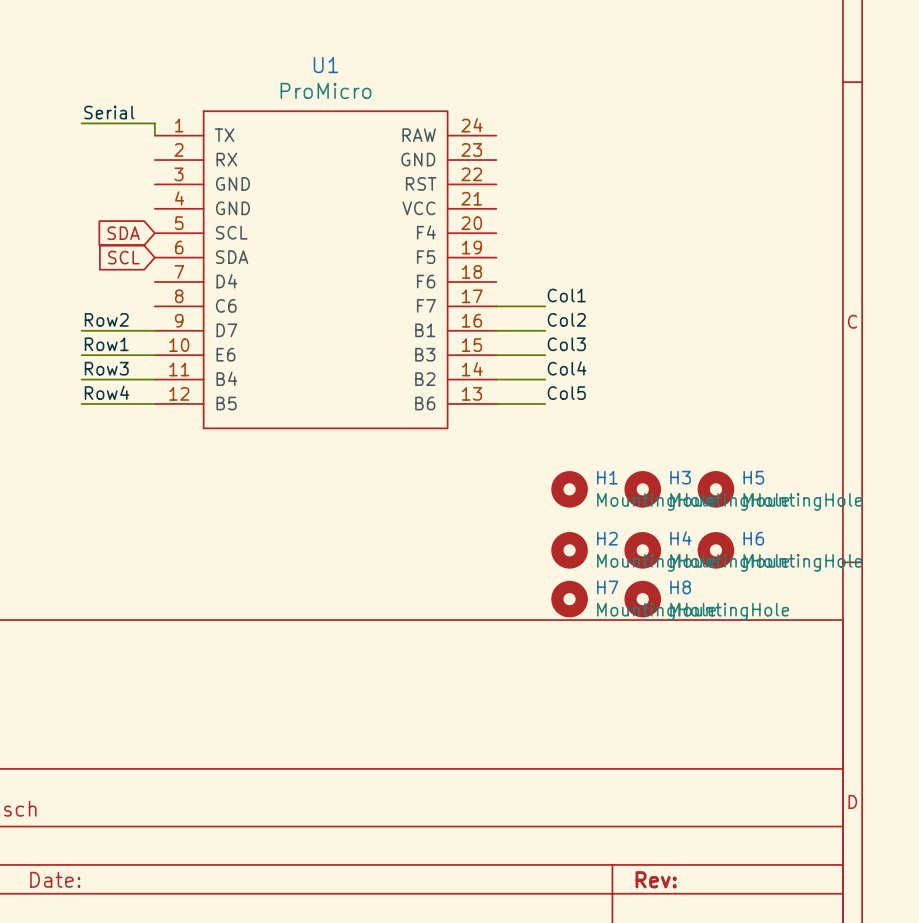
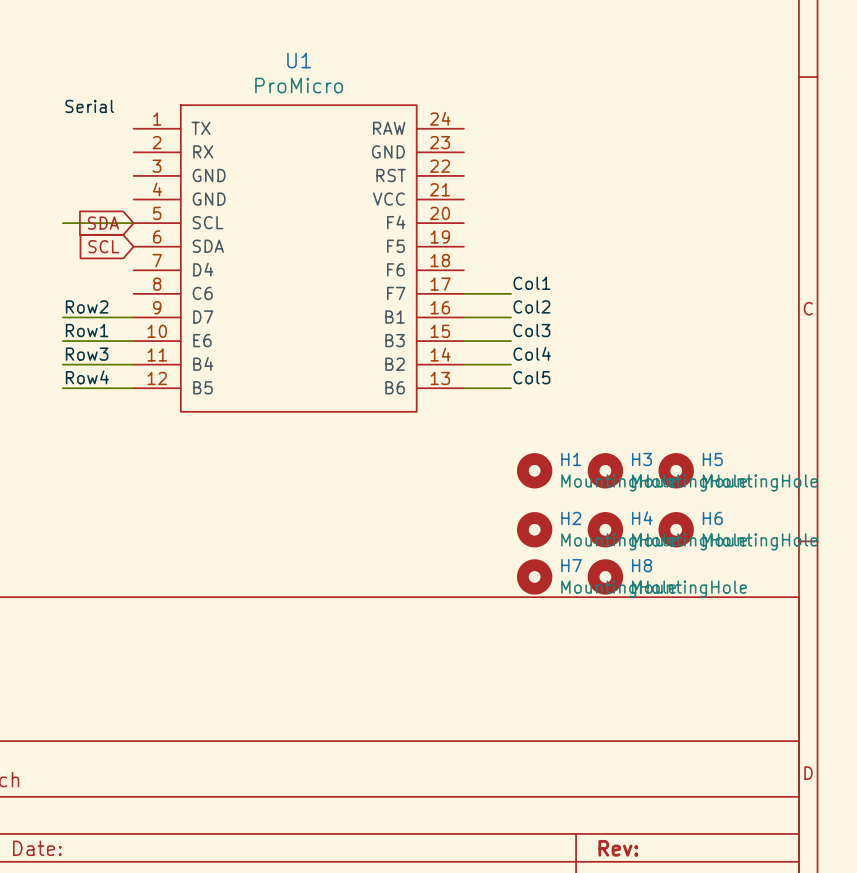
wire: (81, 123) (154, 123) (154, 135) -> none
wire: none -> (62, 223) (133, 223)

